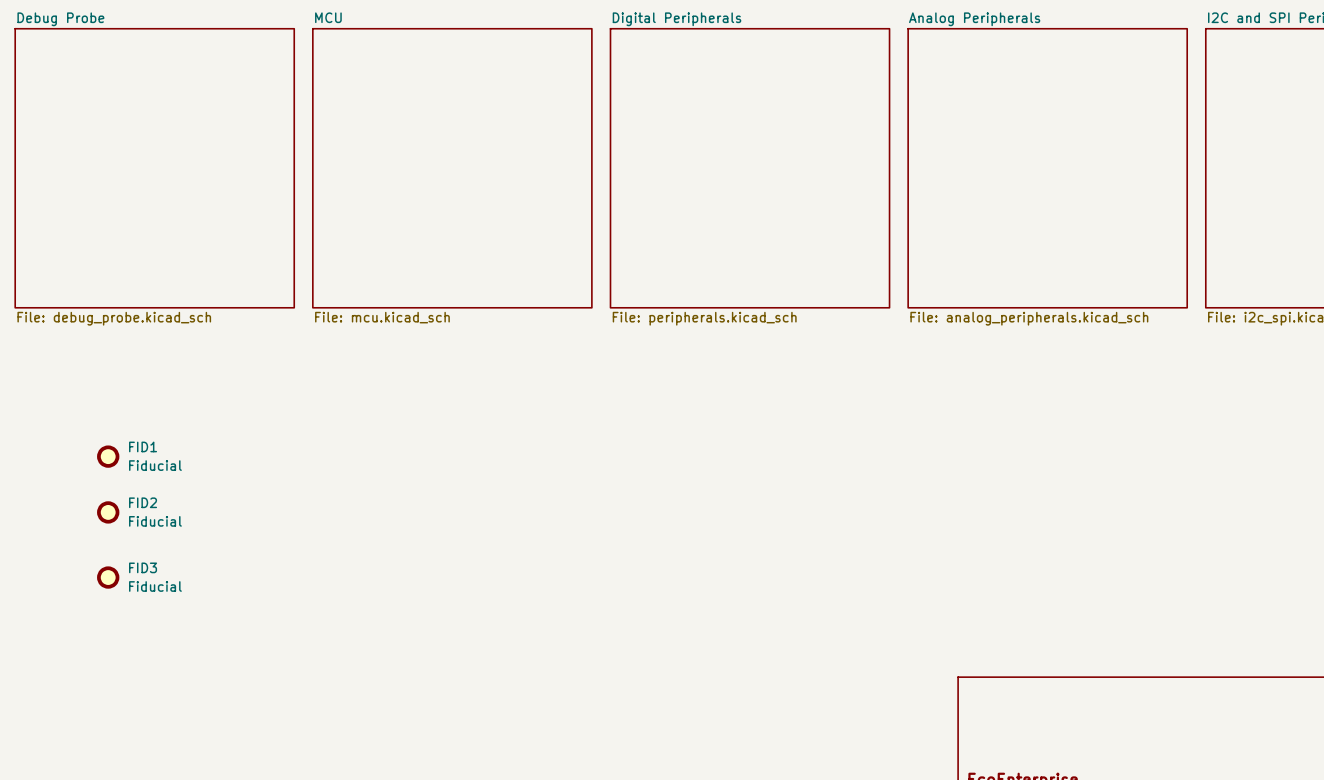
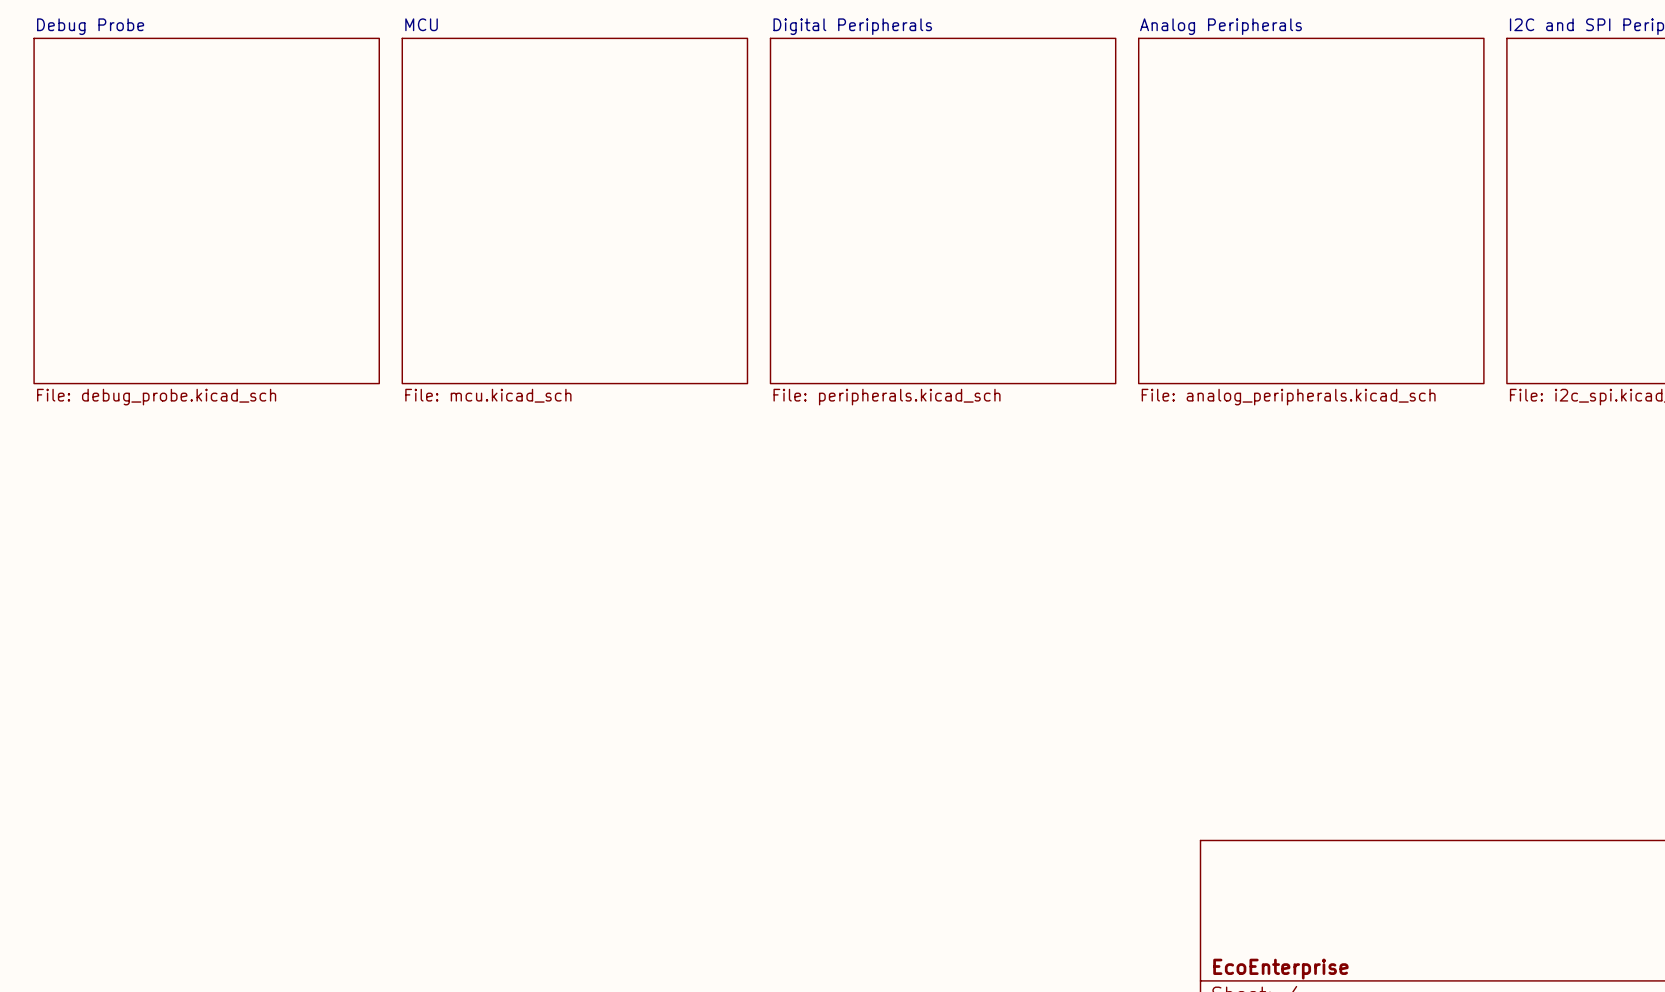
FID1: Fiducial (108, 456) -> none
FID2: Fiducial (108, 512) -> none
FID3: Fiducial (108, 577) -> none

